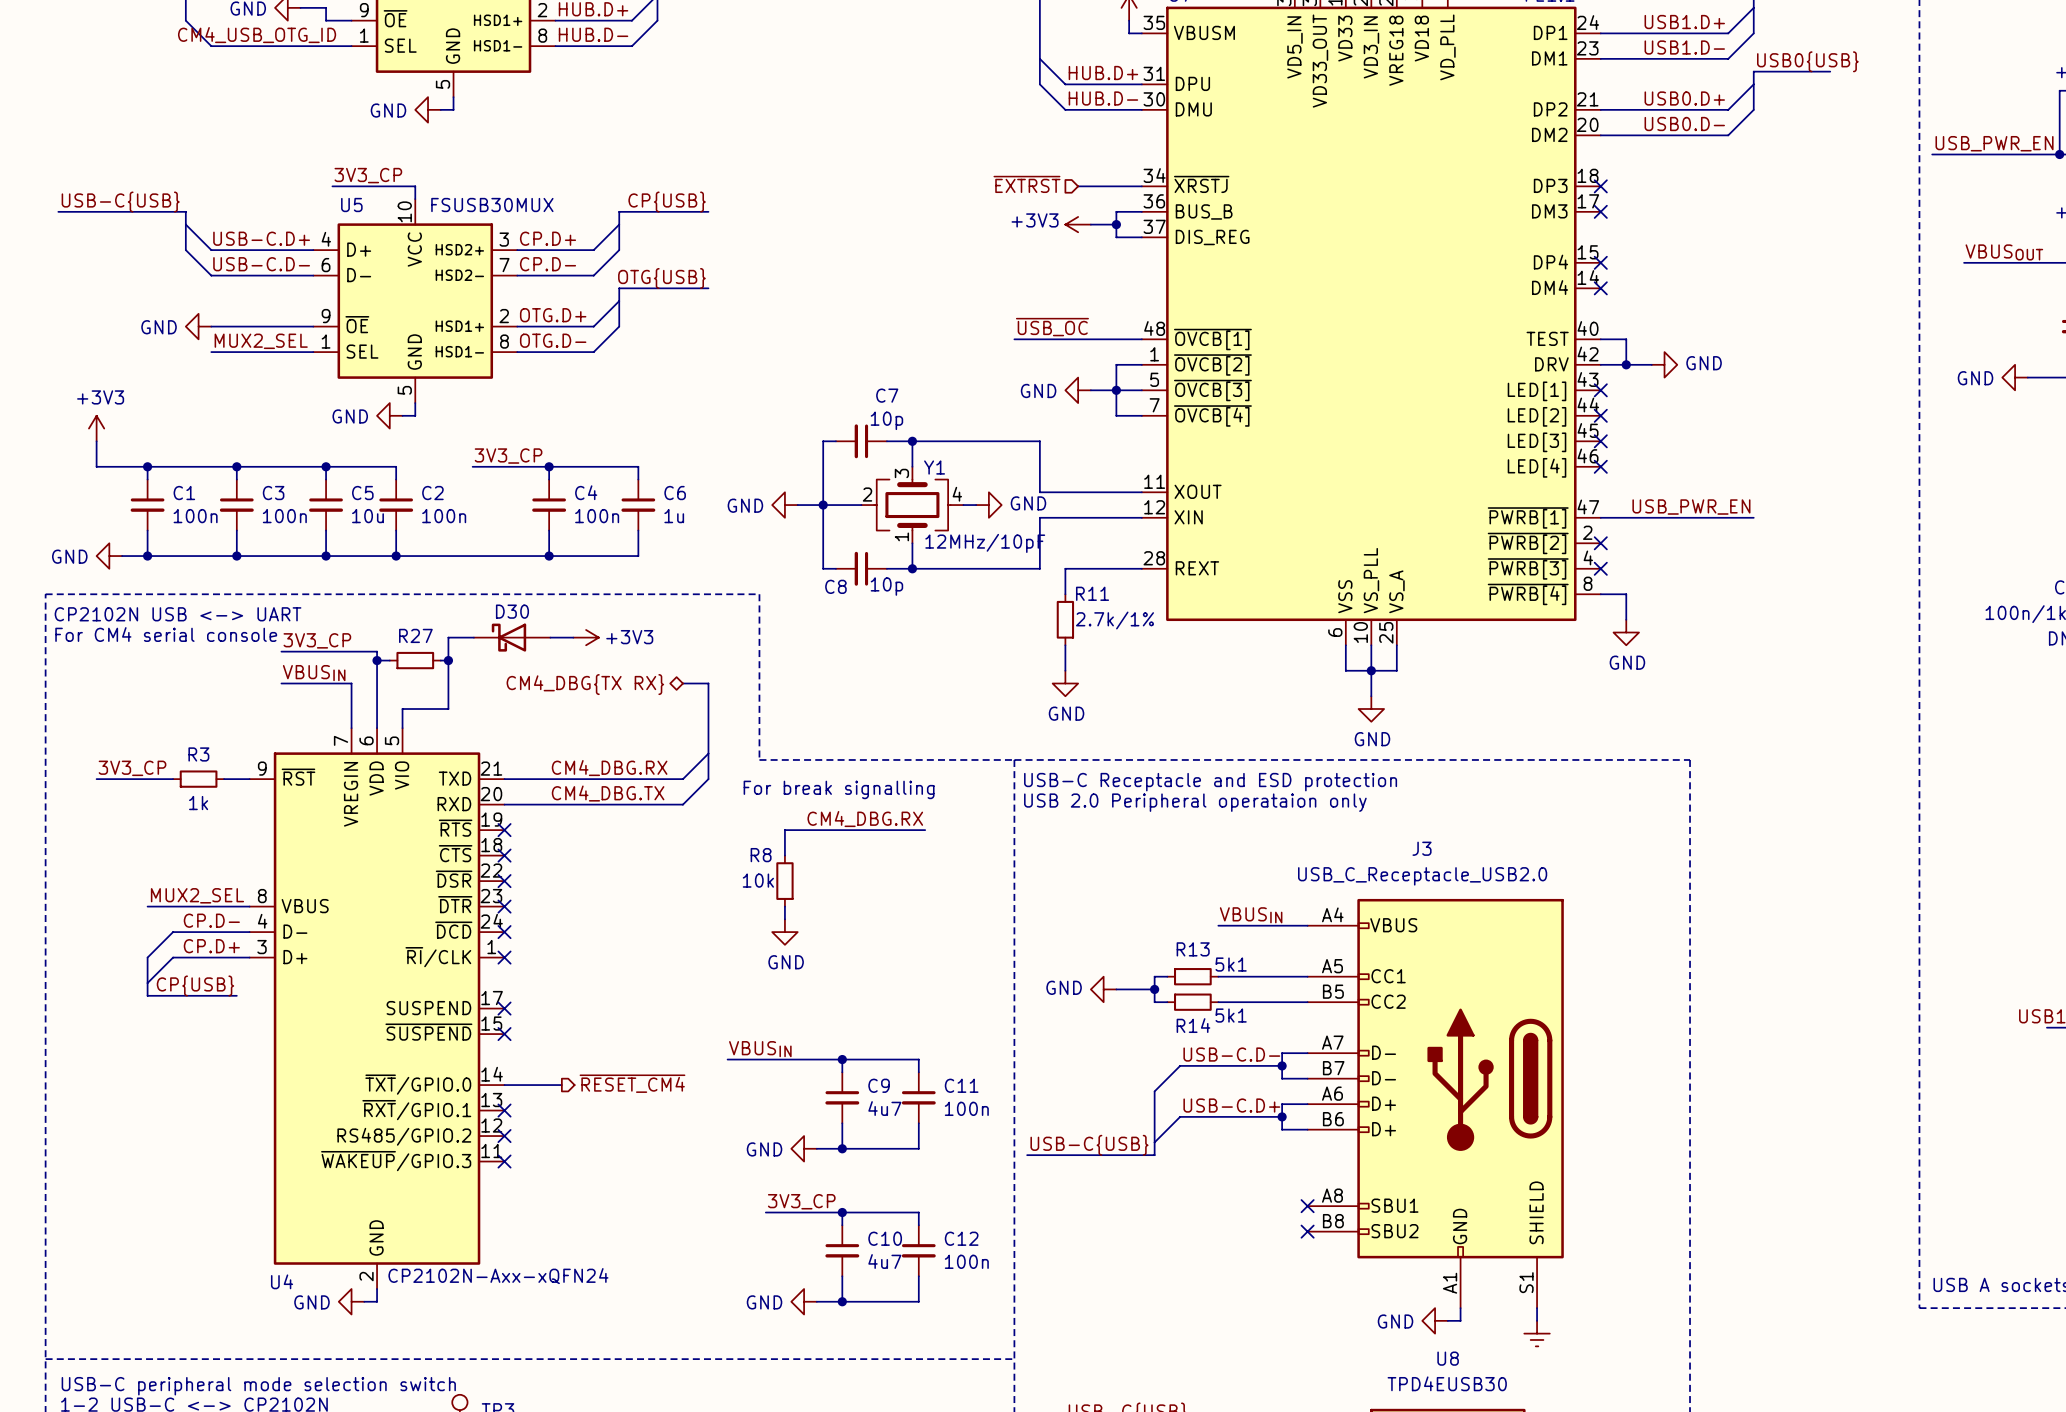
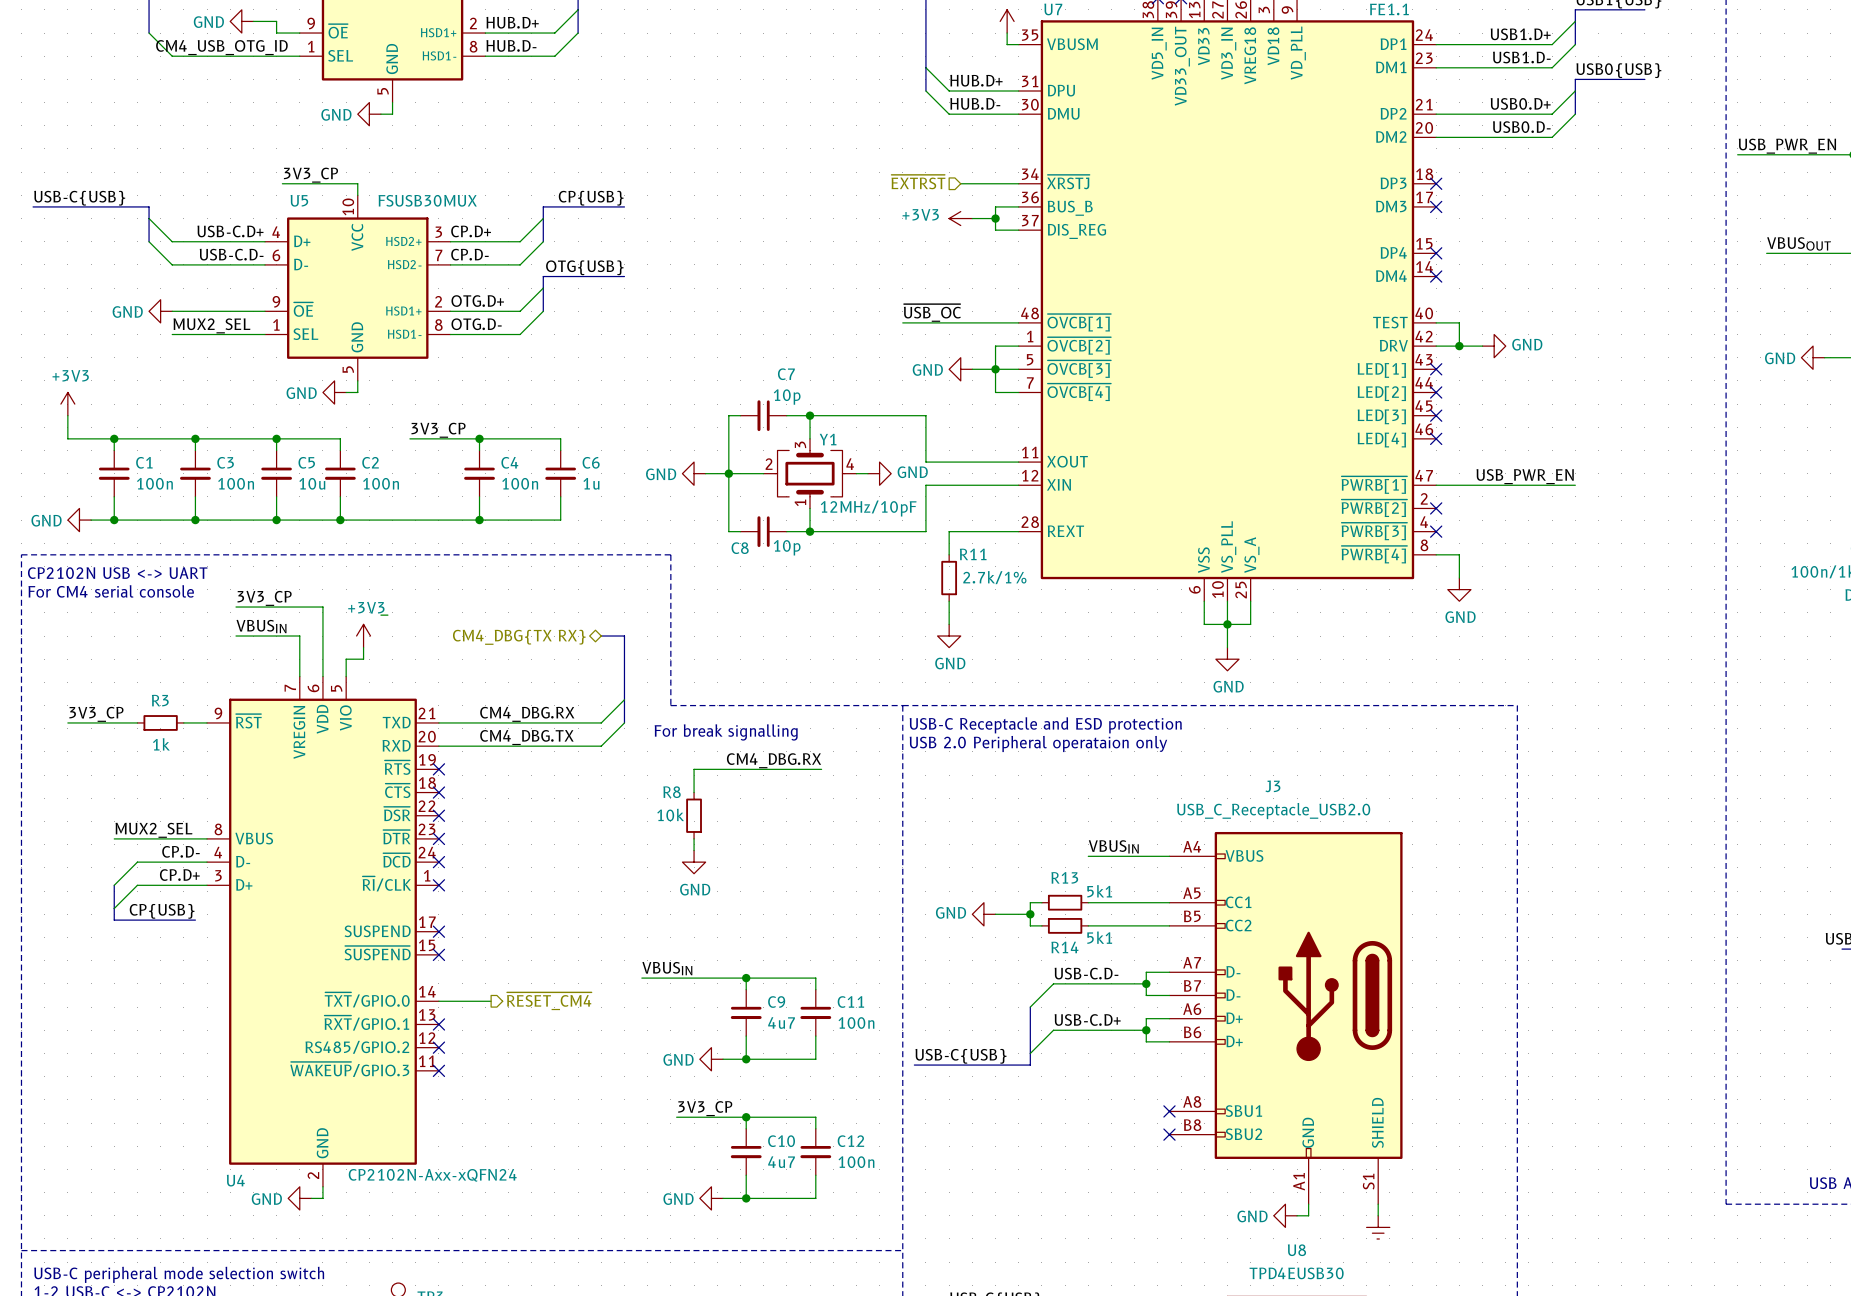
wire: (473, 637) (448, 637) (448, 709) (421, 709) -> (363, 647) (363, 659)
D30: (512, 637) -> none
wire: (550, 637) (573, 637) -> none
power symbol rotation: 0° (586, 637) -> 90° counterclockwise (363, 636)
power symbol position: +3V3 (586, 637) -> +3V3 (363, 636)
wire: (377, 660) (389, 660) -> none
junction: (377, 660) -> none
R27: (415, 660) -> none
junction: (448, 660) -> none

